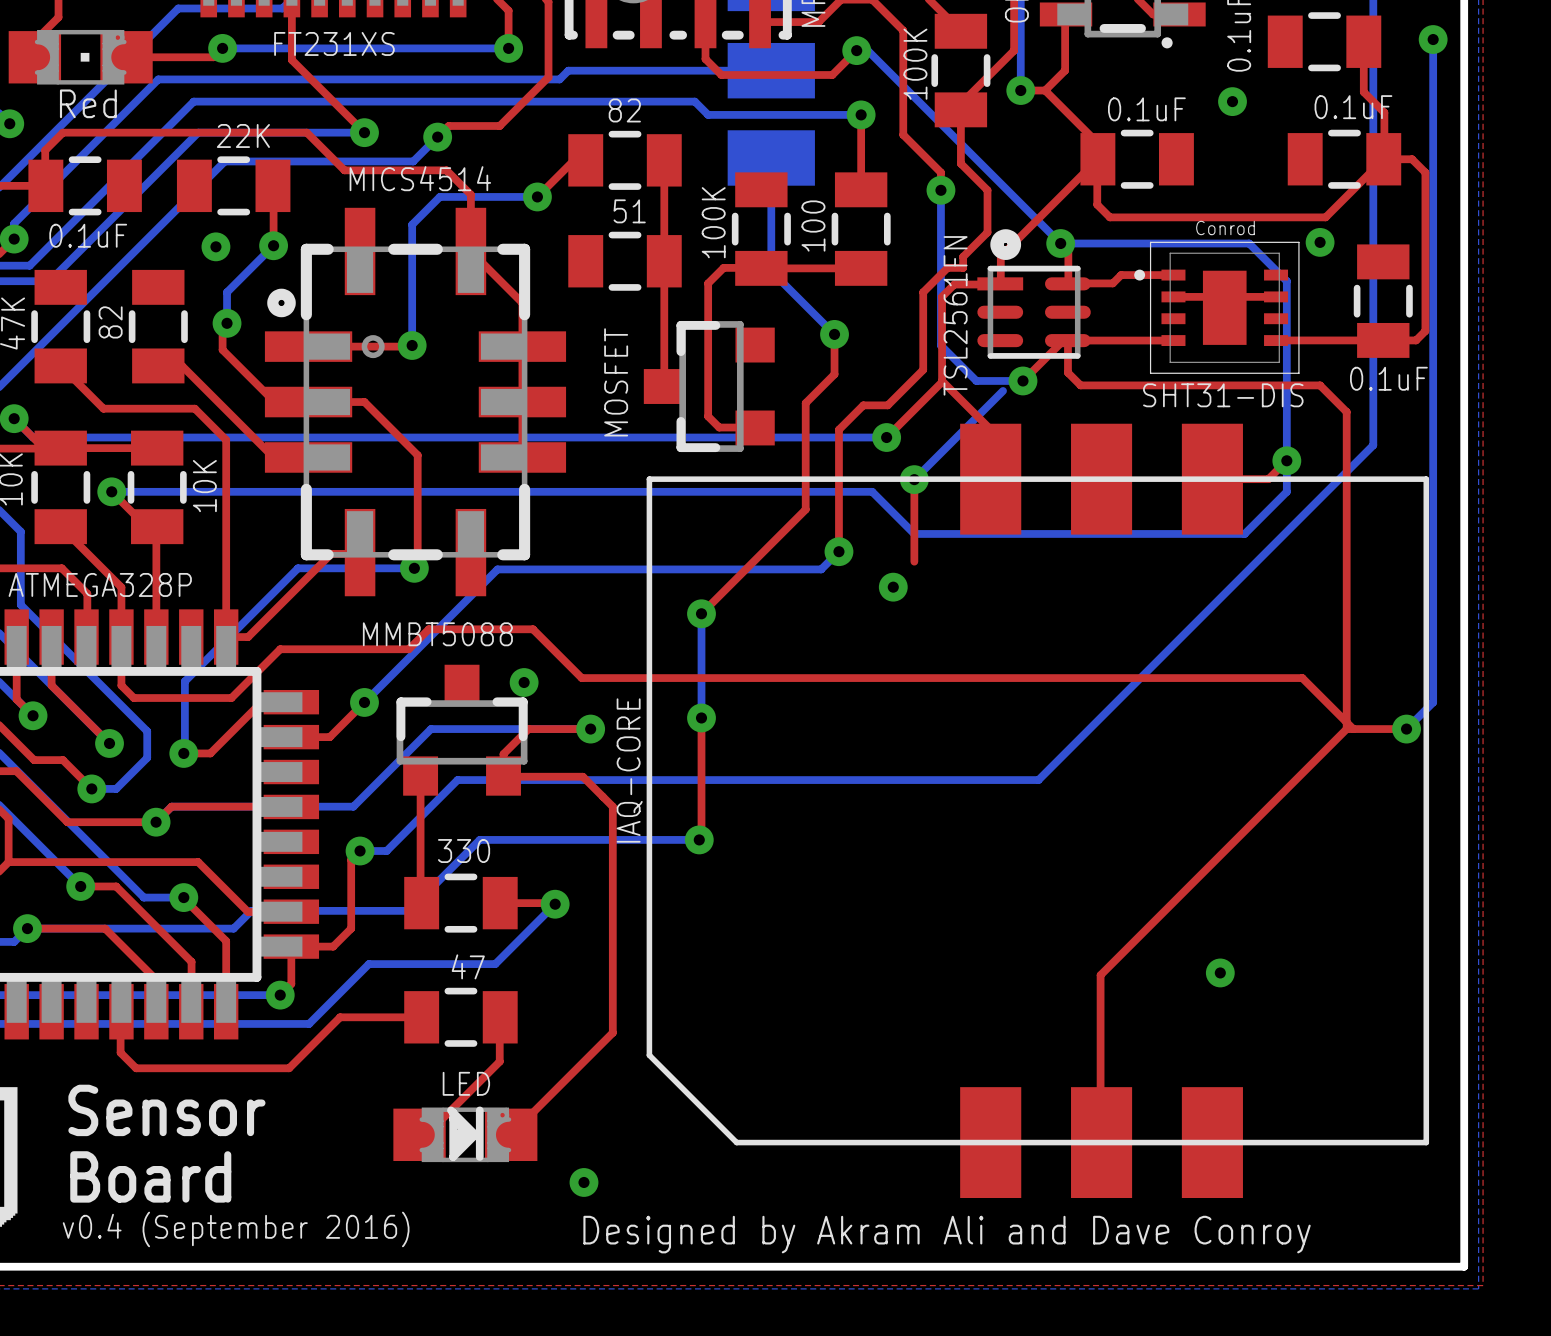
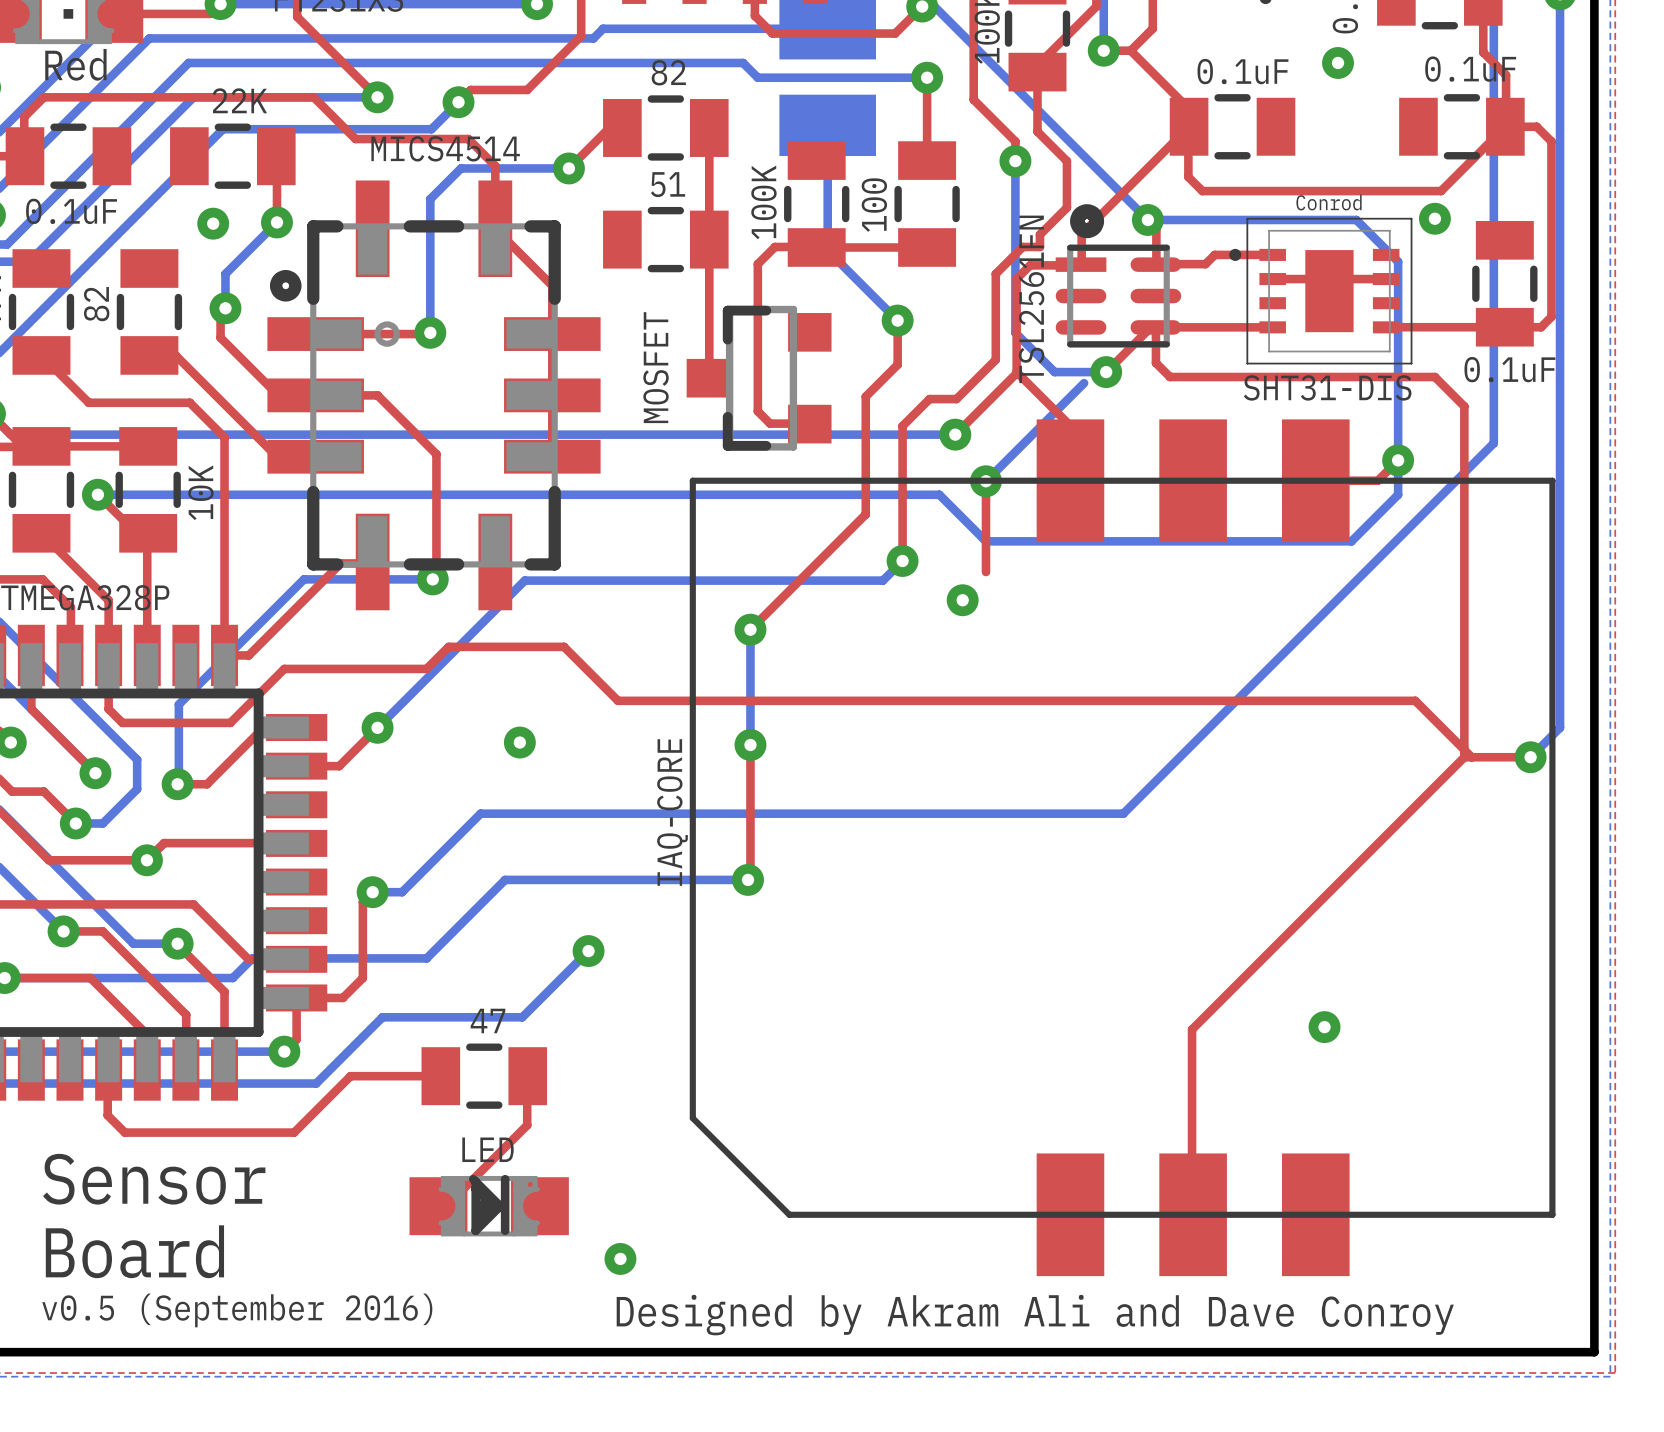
via position: (524, 682) -> (519, 742)
top track: (590, 729) (528, 729) (503, 754) (504, 776) (582, 776) (612, 806) (612, 1032) (511, 1134) -> none
bottom track: (590, 729) (431, 729) (353, 806) (171, 806) -> none
via: (590, 729) -> none
part: MMBT5088 (462, 730) -> none
top track: (419, 776) (421, 903) -> none
part: 330 (460, 903) -> none
top track: (500, 903) (554, 903) -> none
text: v0.4 (September 2016) (236, 1229) -> v0.5 (September 2016) (237, 1310)

